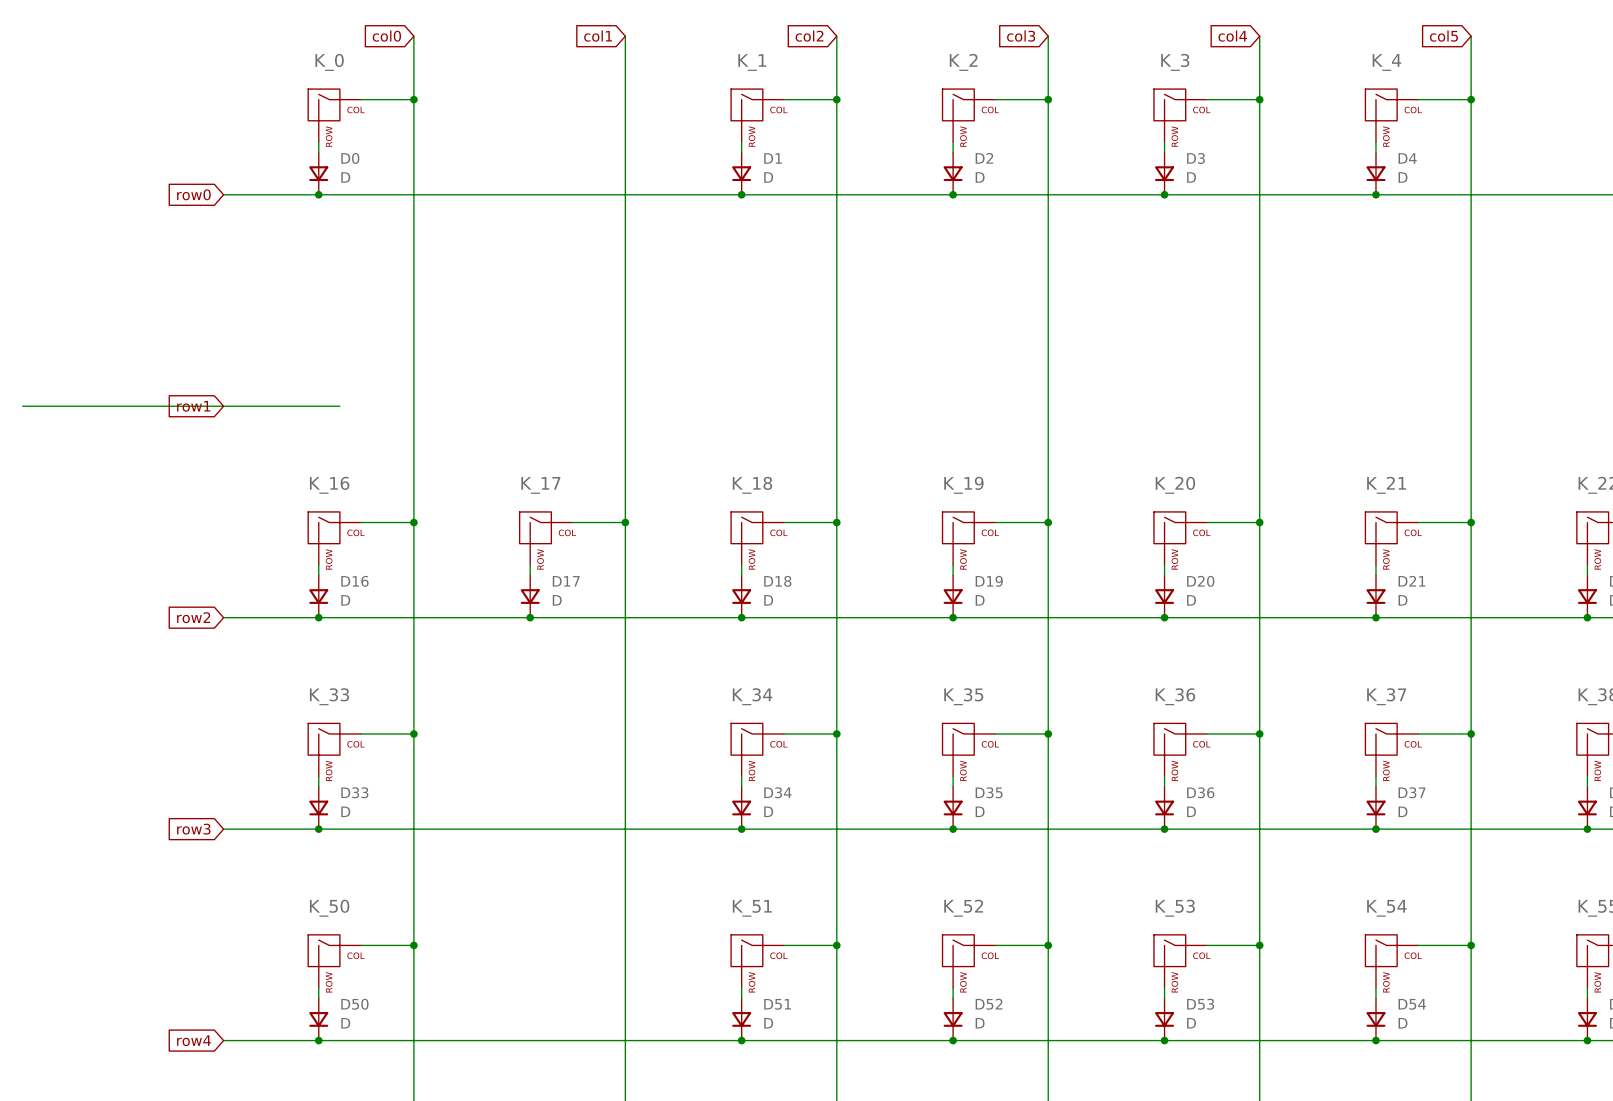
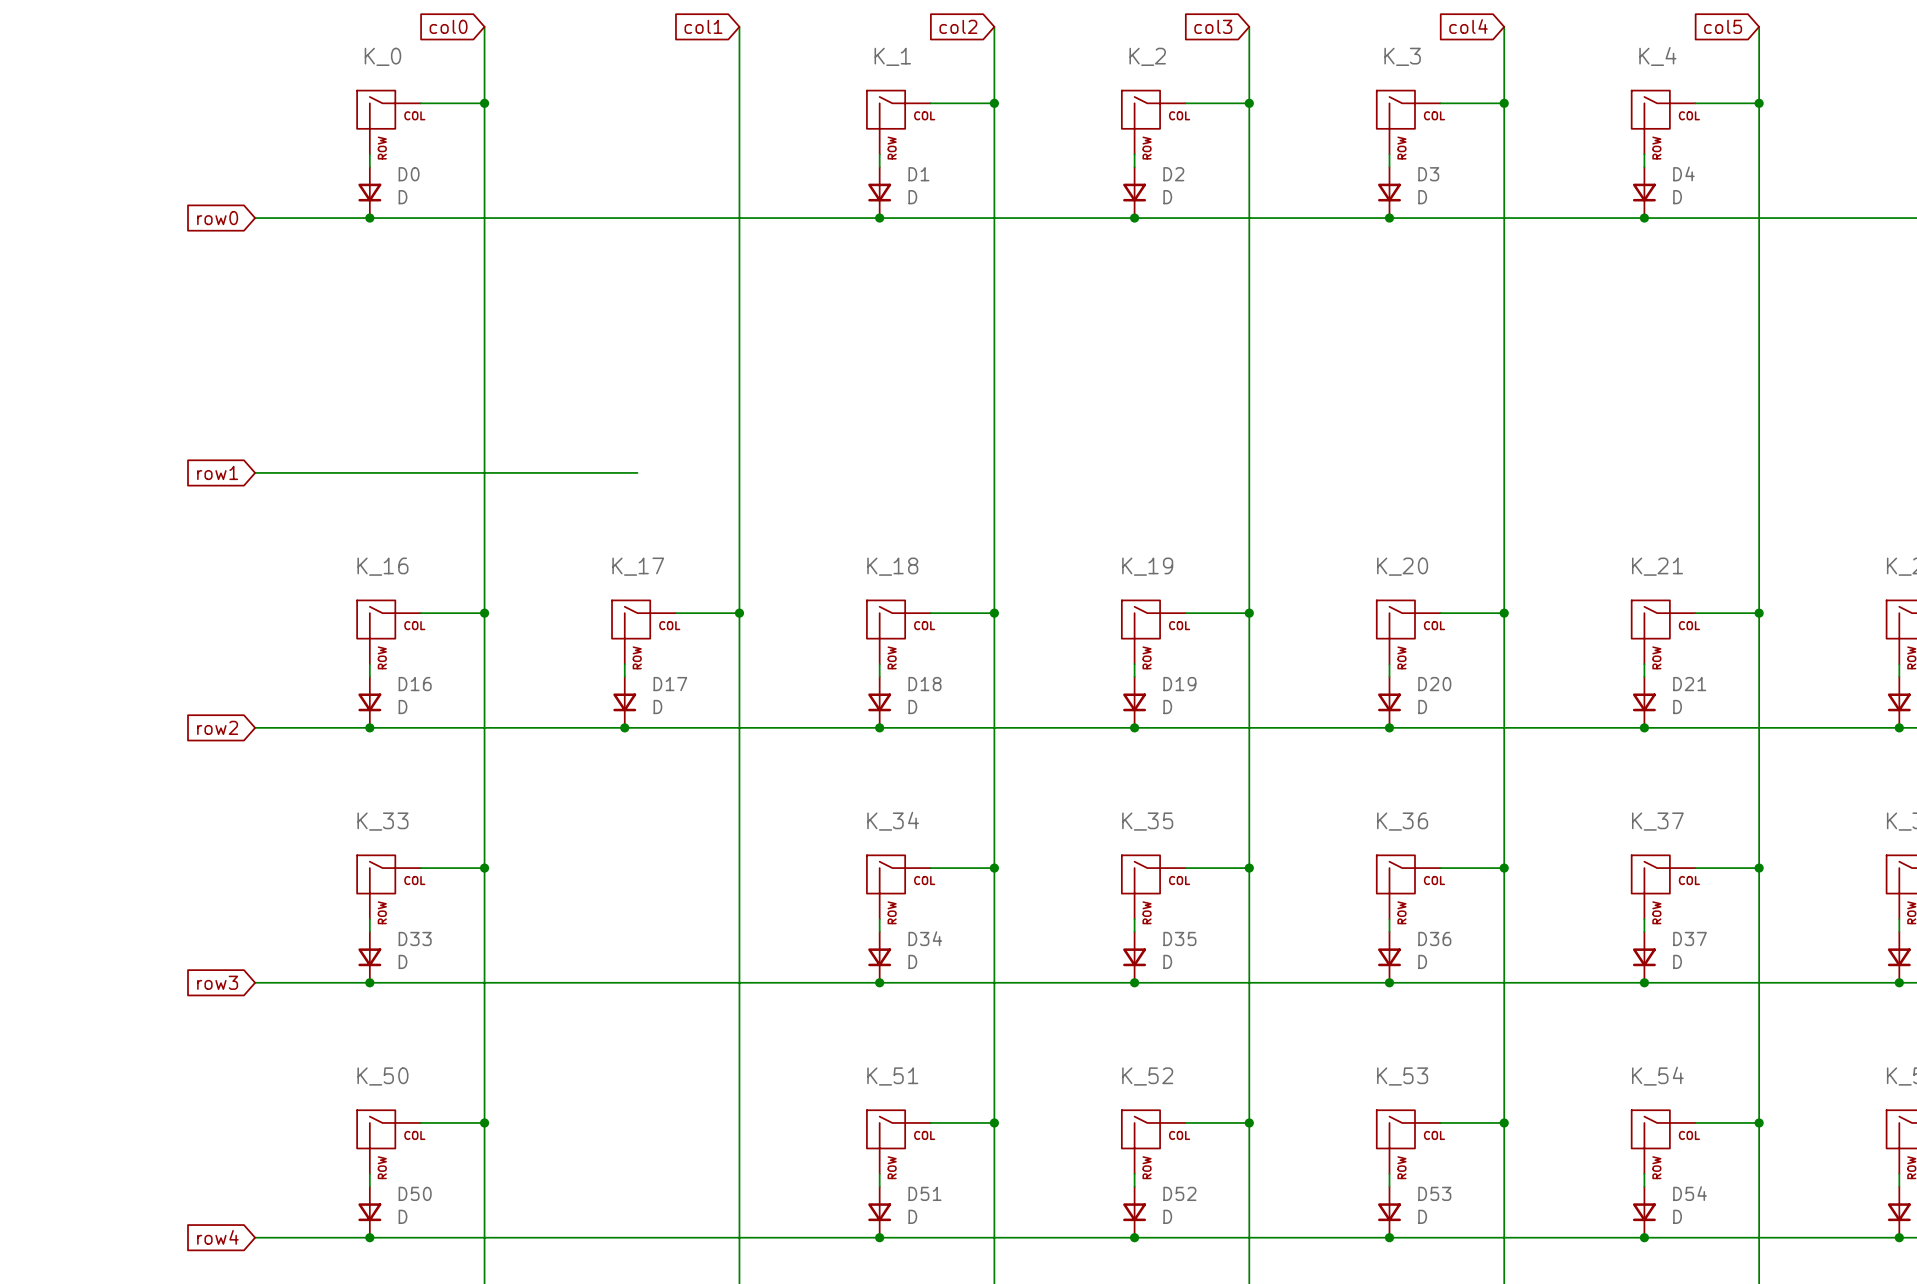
wire: (22, 406) (223, 406) -> none
wire: none -> (395, 472) (637, 472)

